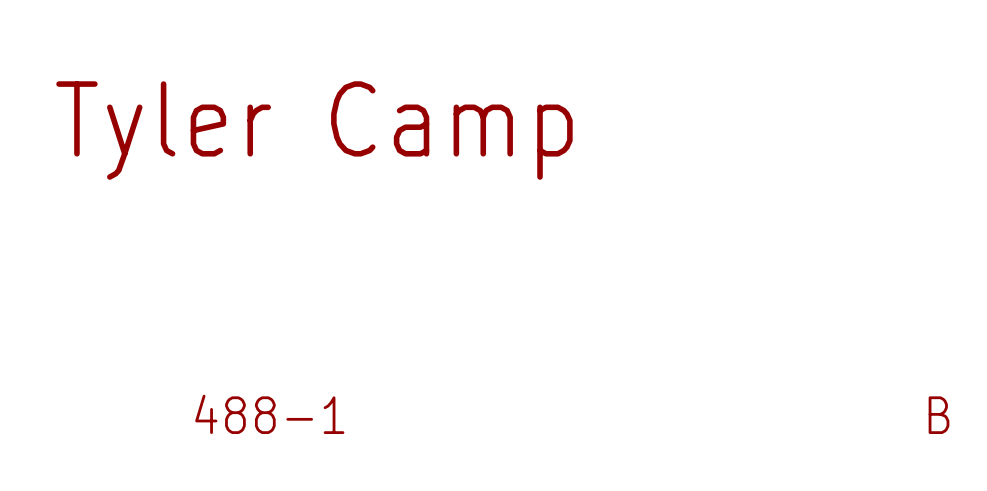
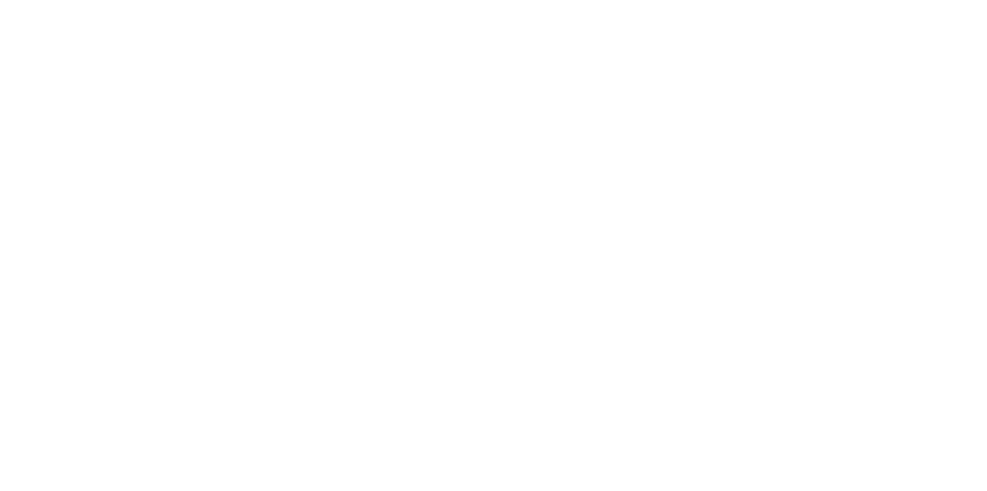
text: Tyler Camp (314, 130) -> none
text: 488-1 (269, 414) -> none
text: B (939, 415) -> none

